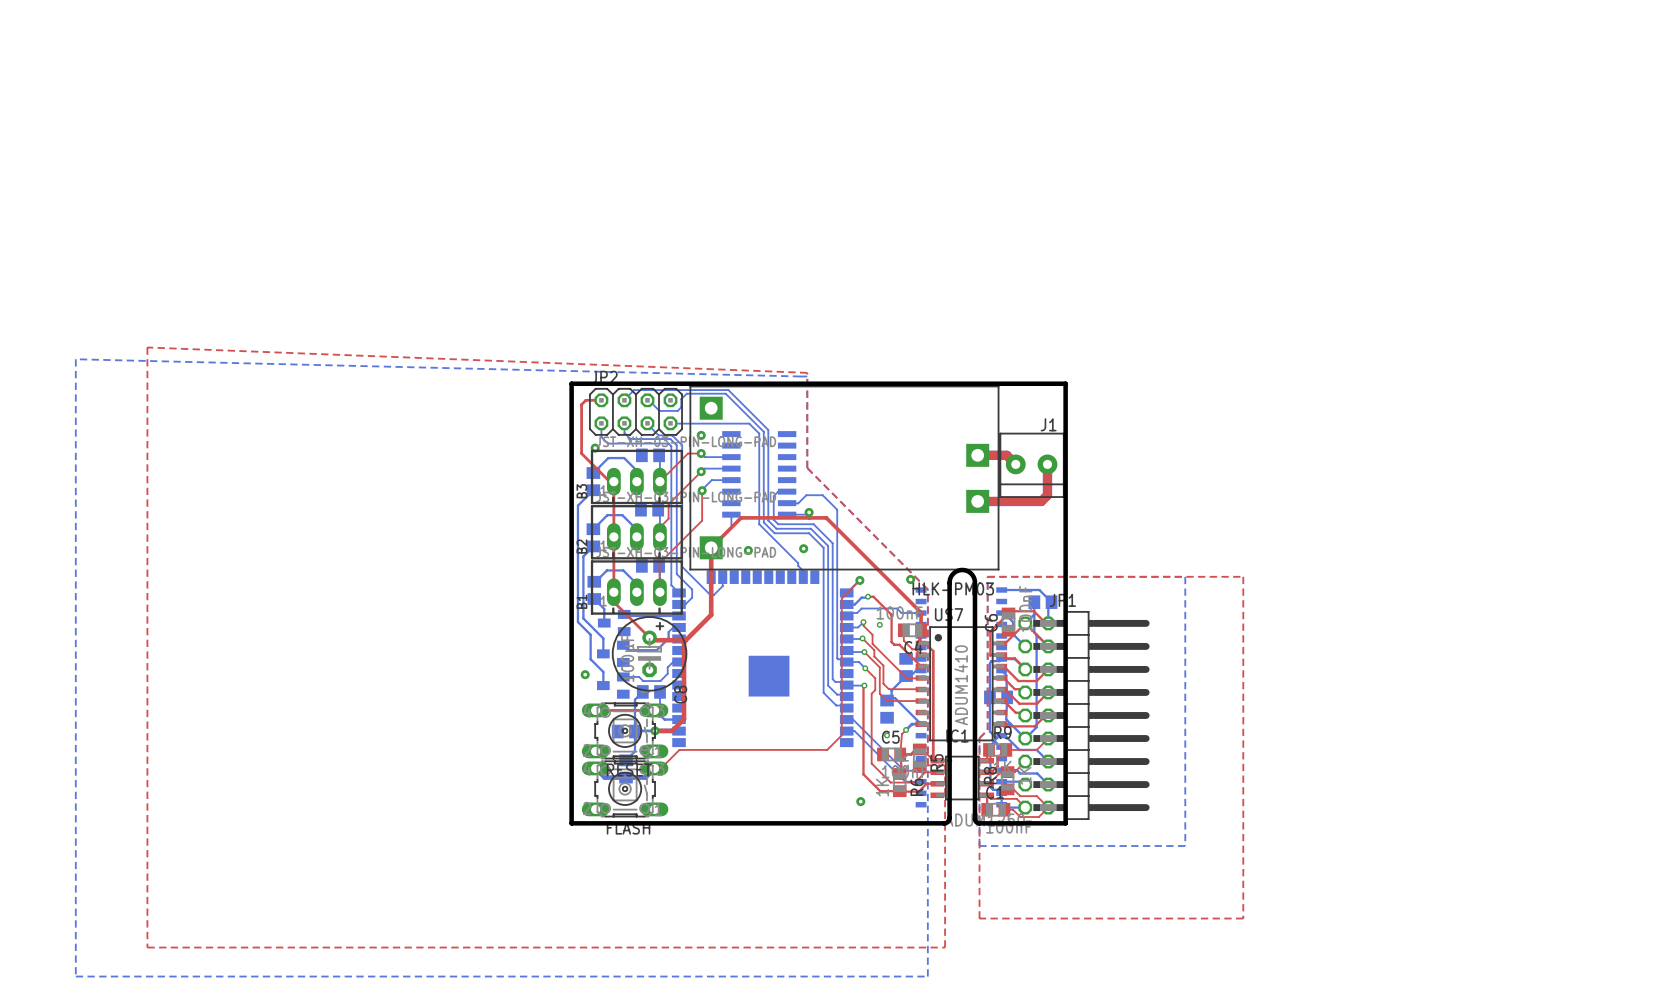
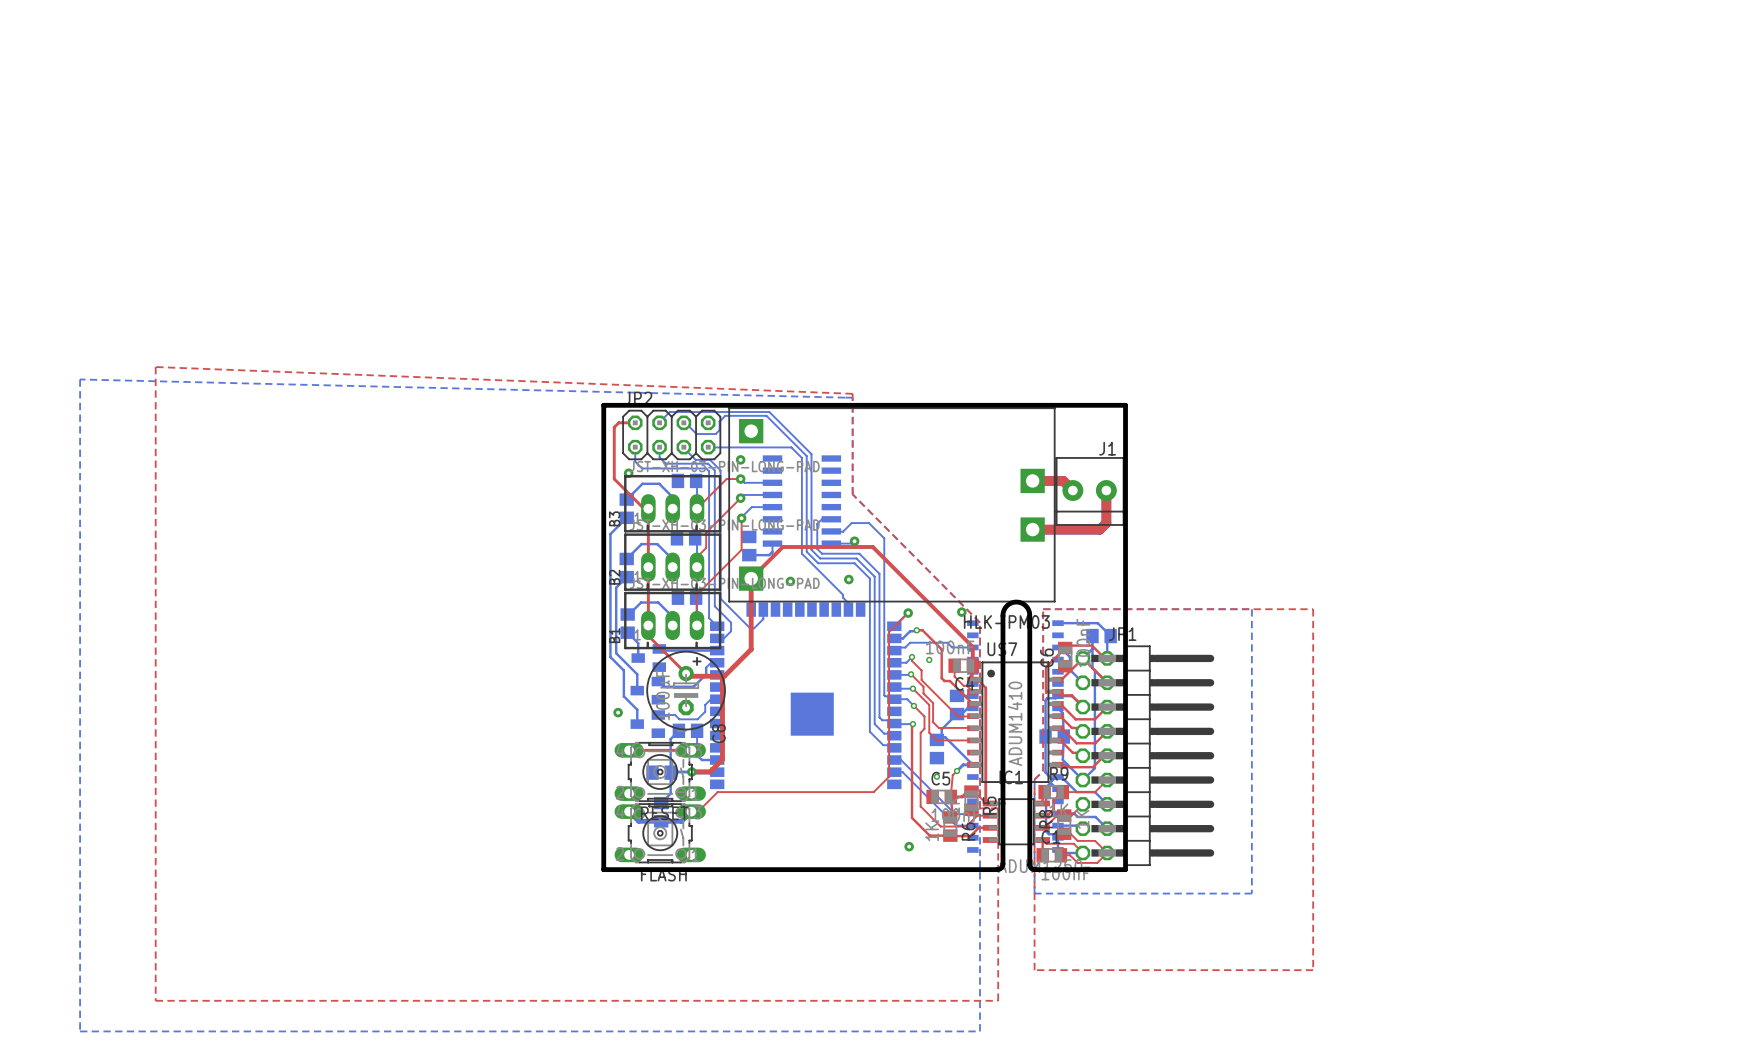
part: none -> (749, 546)
bottom track: none -> (772, 551) (769, 555) (749, 555)

